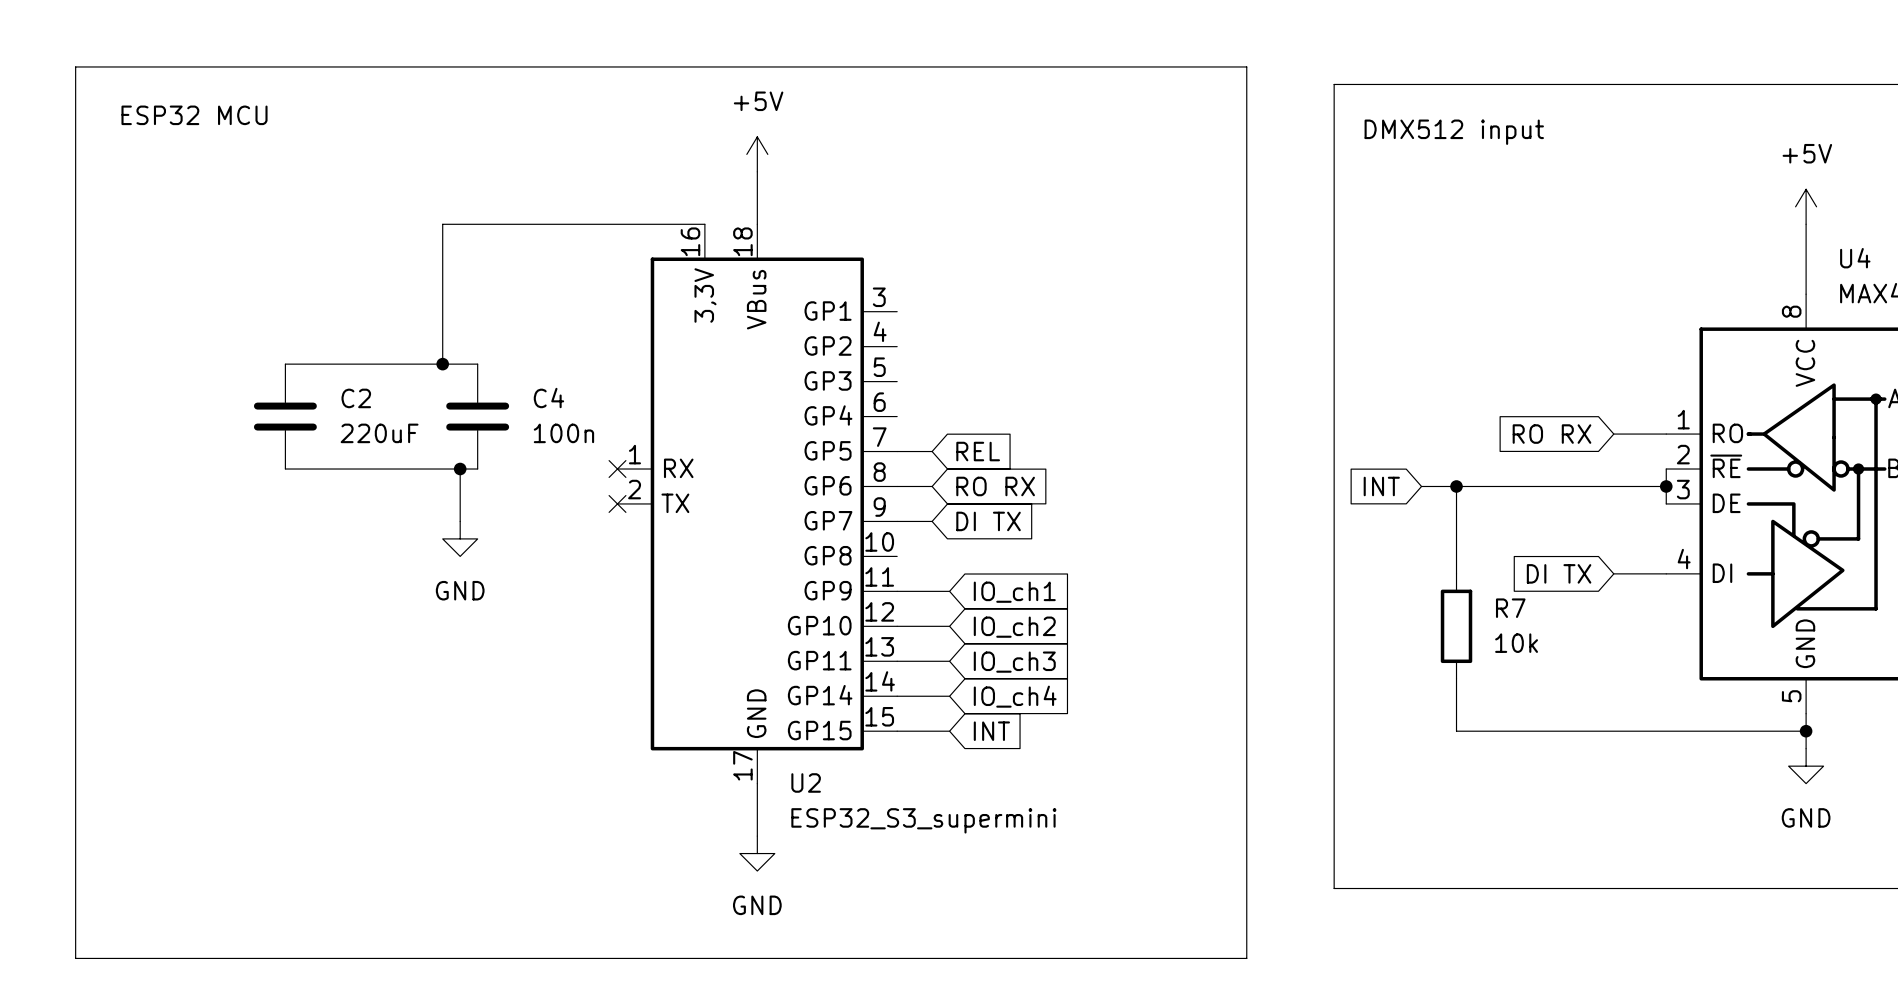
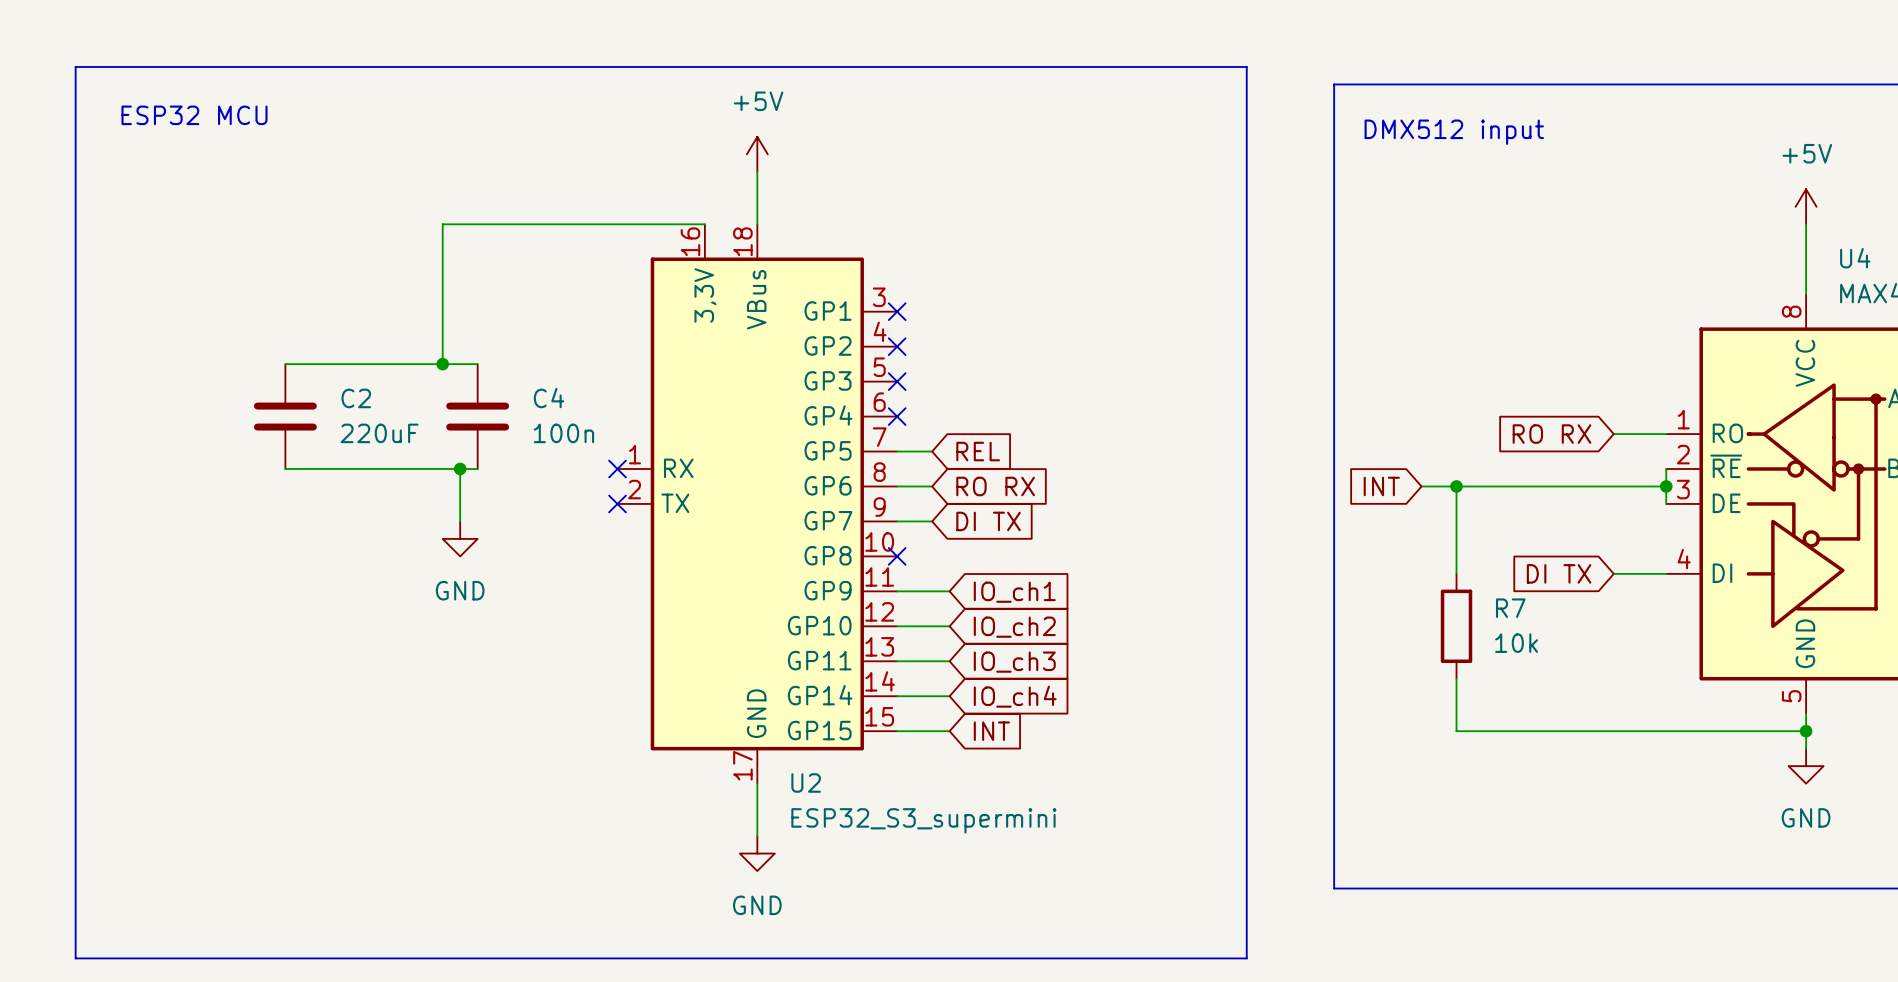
no-connect mark: none -> (897, 311)
no-connect mark: none -> (897, 346)
no-connect mark: none -> (897, 381)
no-connect mark: none -> (897, 416)
no-connect mark: none -> (897, 556)

